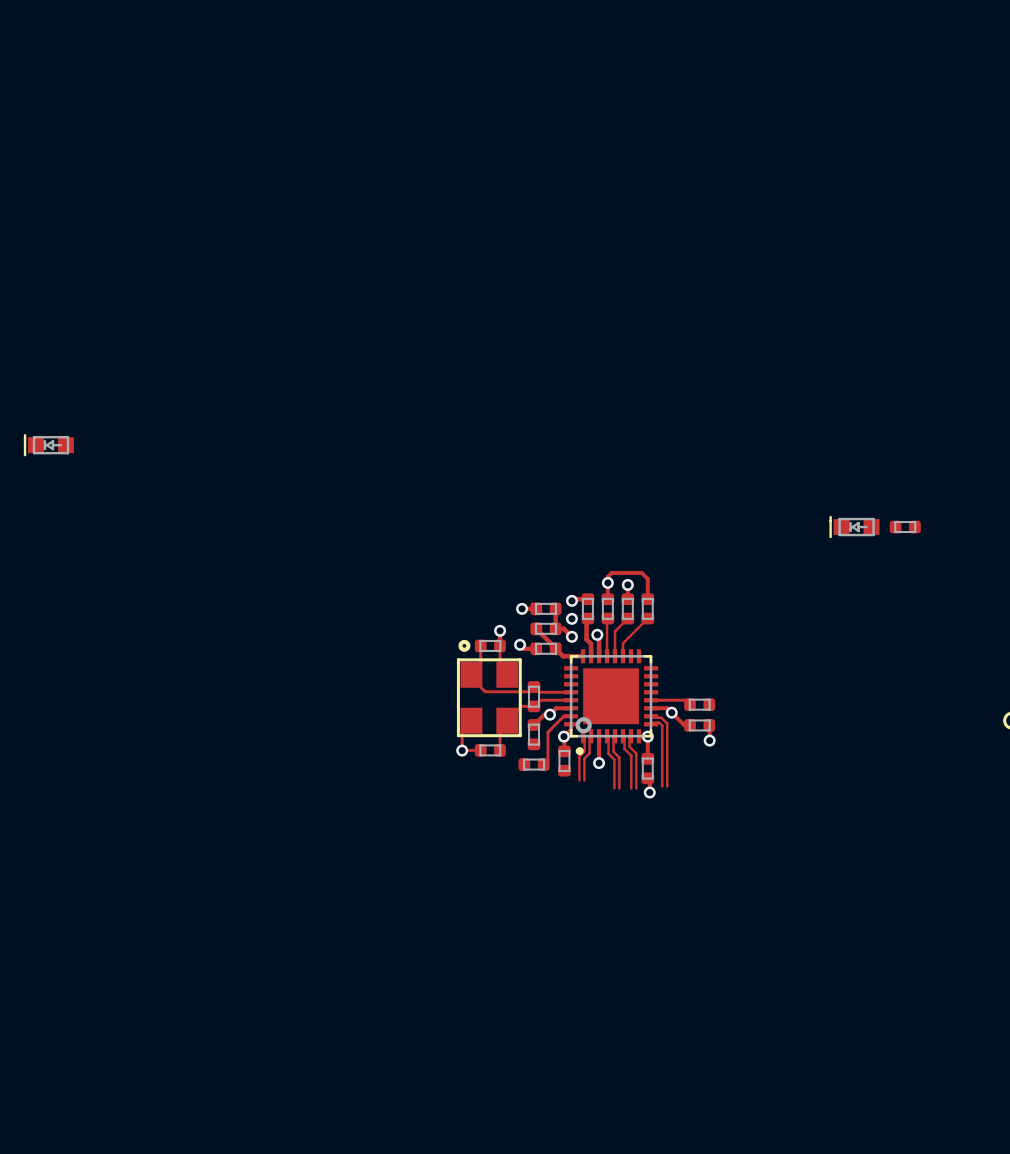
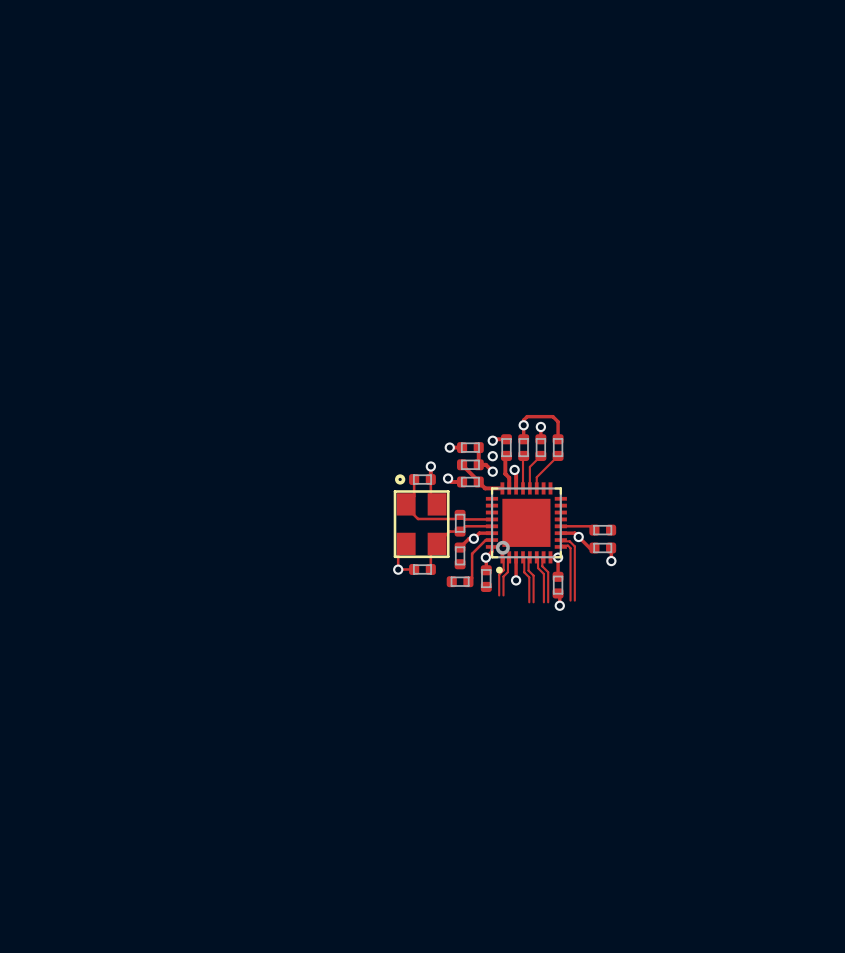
part: (48, 445) -> none
part: (854, 527) -> none
part: (905, 527) -> none

